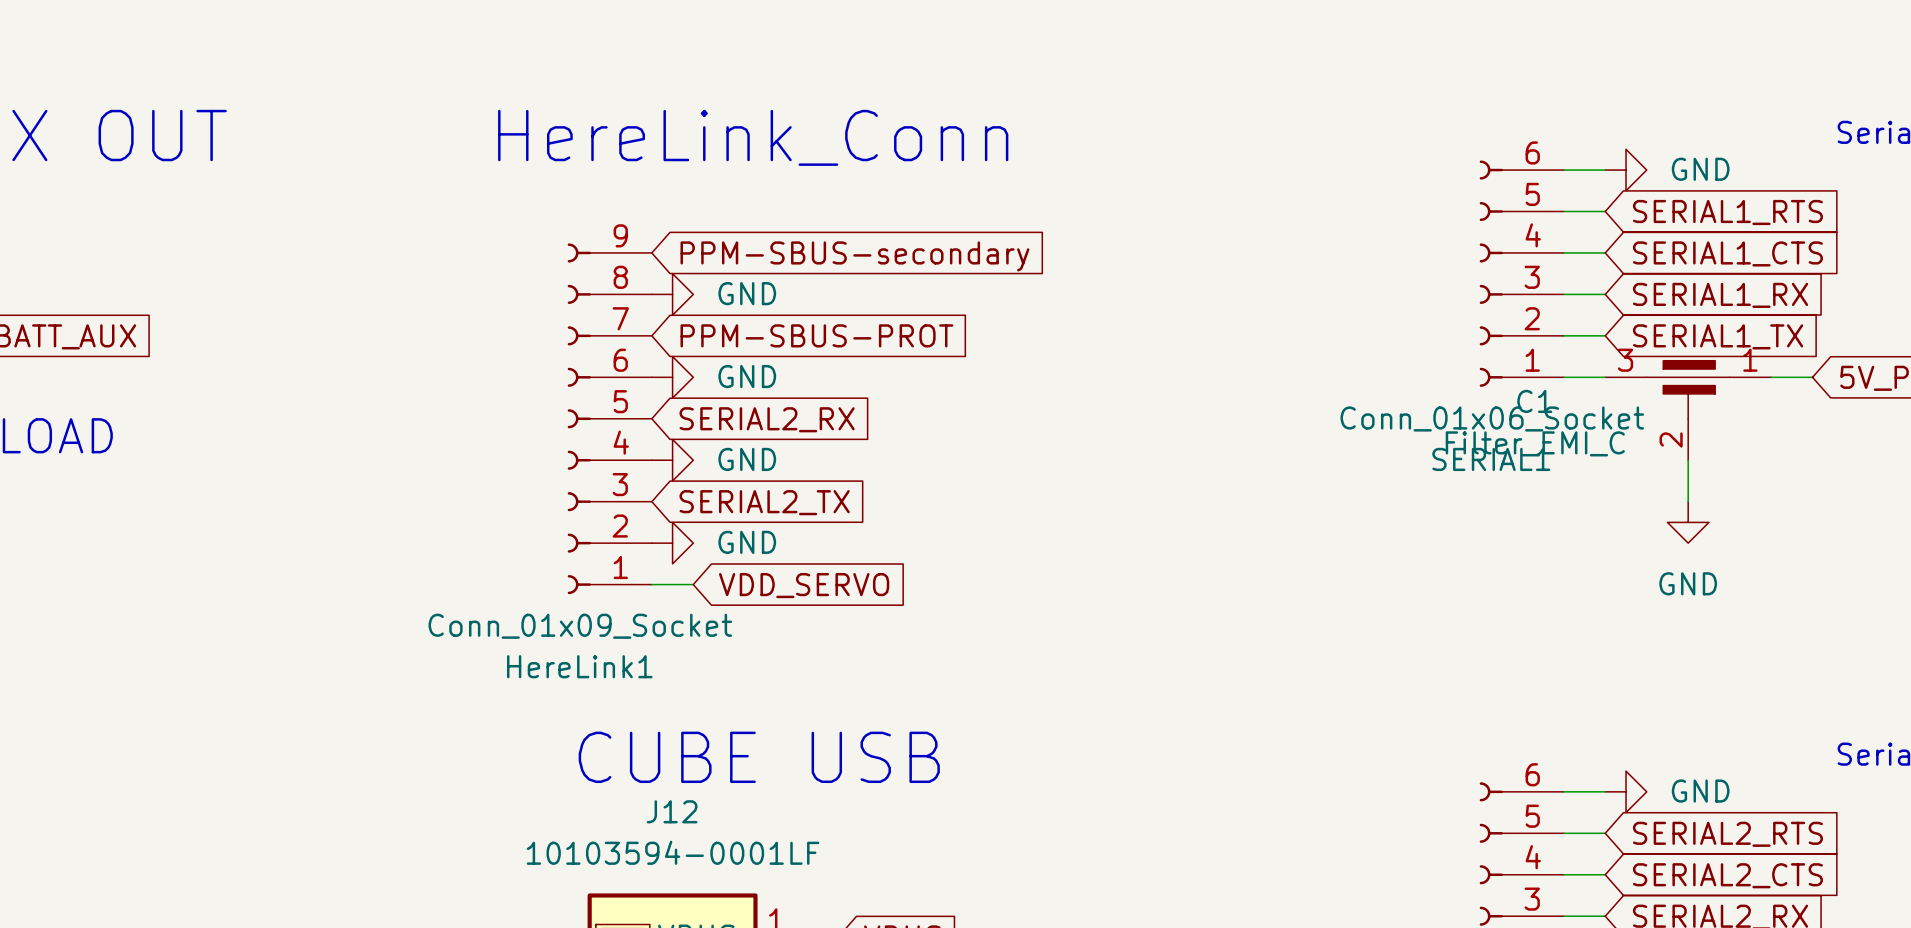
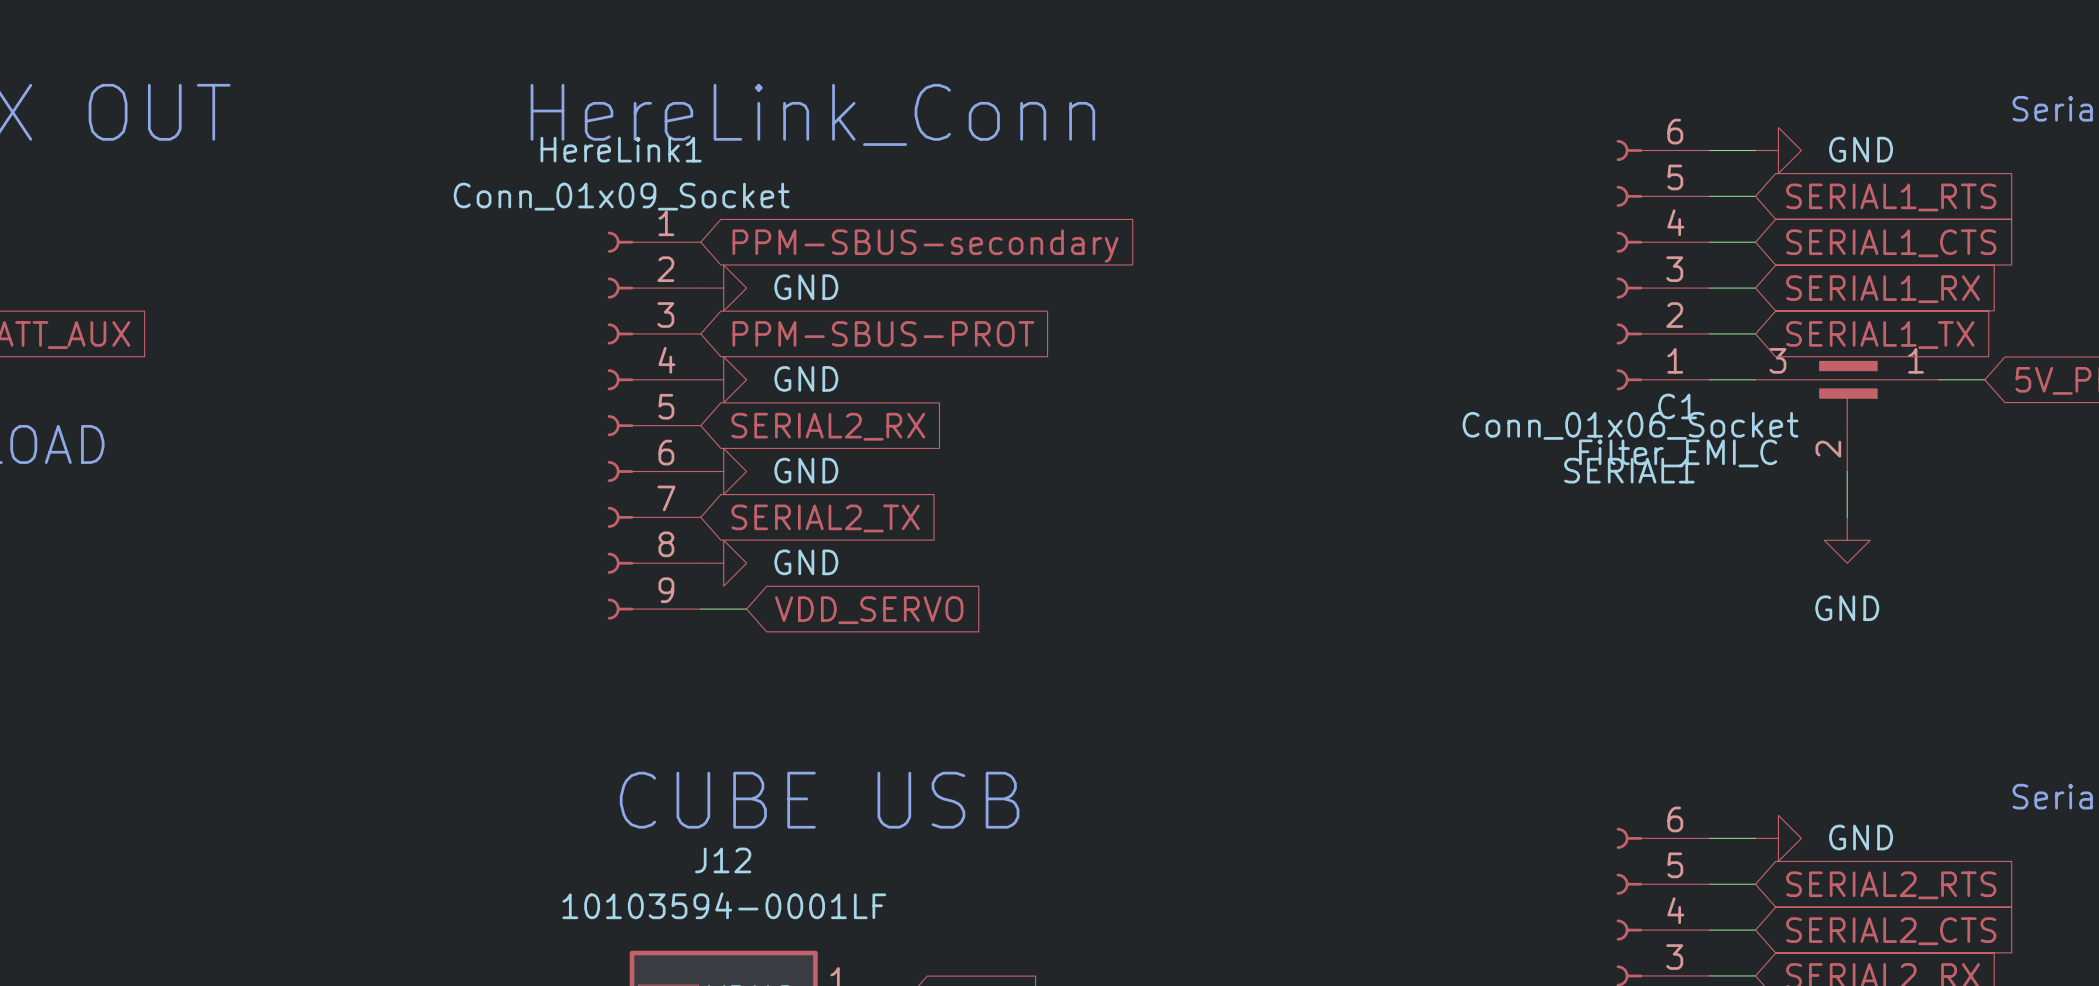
HereLink1 flip: as is (579, 418) -> up-down (620, 425)

